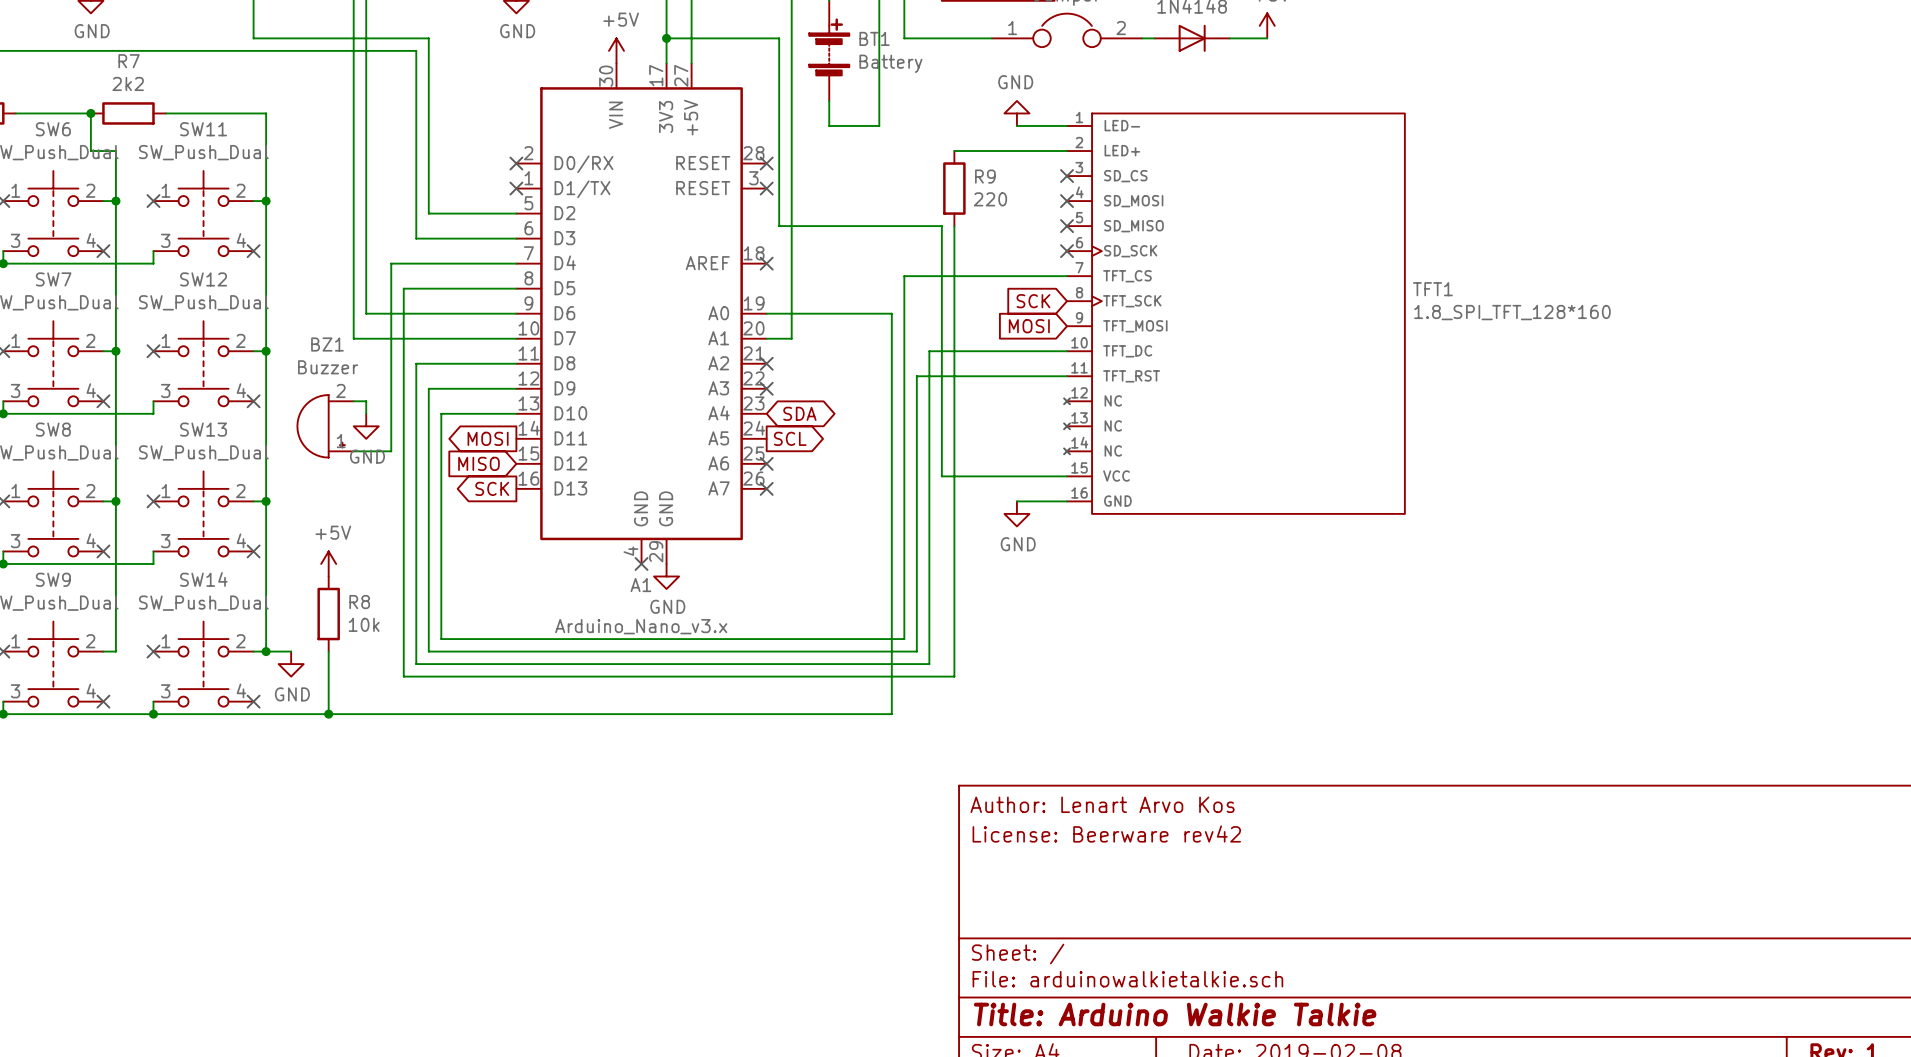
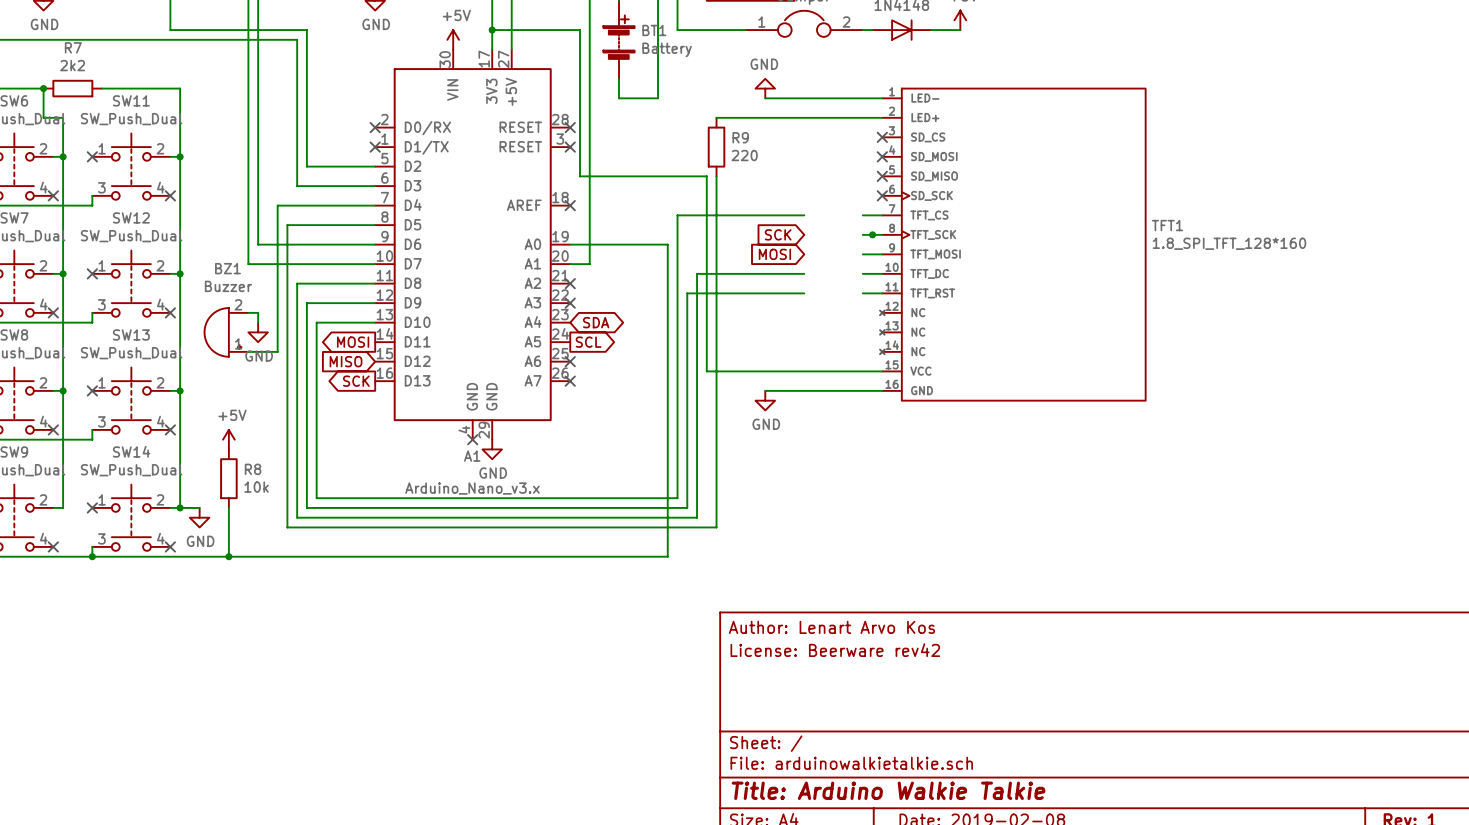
wire: none -> (804, 98) (882, 98)
wire: none -> (804, 117) (882, 117)
no-connect mark: (1067, 176) -> none
no-connect mark: none -> (882, 137)
no-connect mark: (1067, 201) -> none
no-connect mark: none -> (882, 156)
no-connect mark: (1067, 226) -> none
no-connect mark: none -> (882, 176)
no-connect mark: (1067, 251) -> none
no-connect mark: none -> (882, 195)
wire: none -> (862, 215) (882, 215)
wire: none -> (862, 234) (882, 234)
junction: none -> (872, 234)
TFT1 position: (1234, 313) -> (1012, 244)
wire: none -> (862, 254) (882, 254)
wire: none -> (862, 273) (882, 273)
wire: none -> (862, 293) (882, 293)
wire: none -> (804, 371) (882, 371)
wire: none -> (804, 390) (882, 390)

